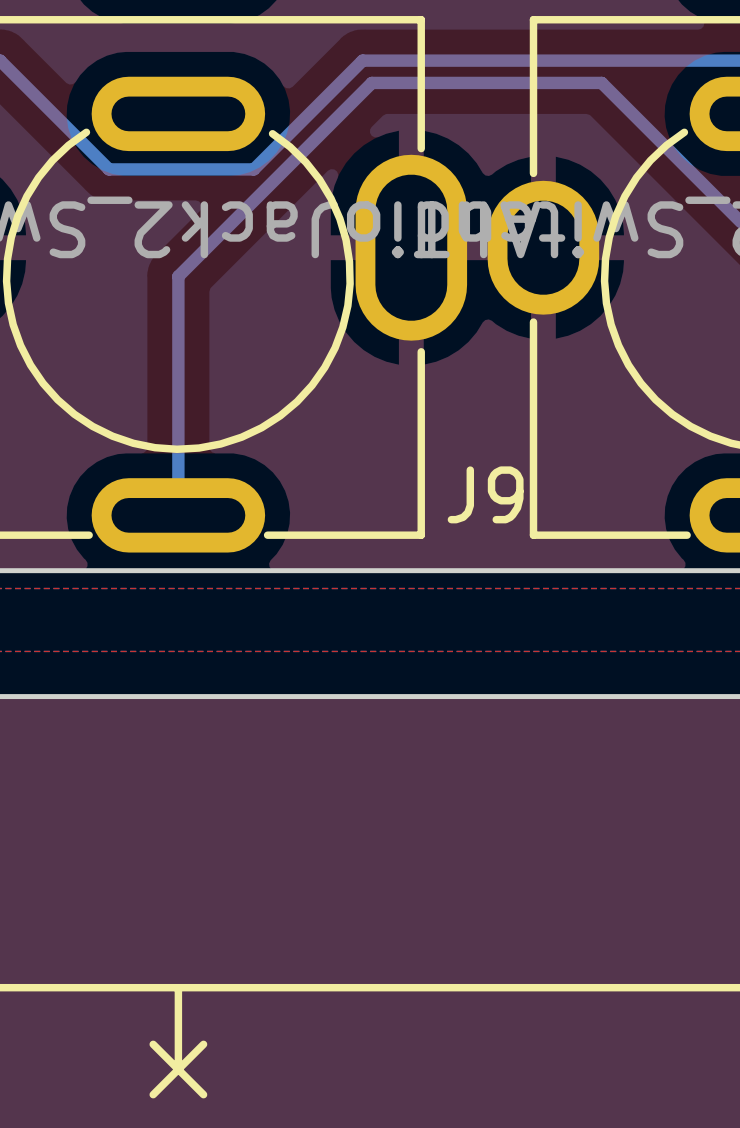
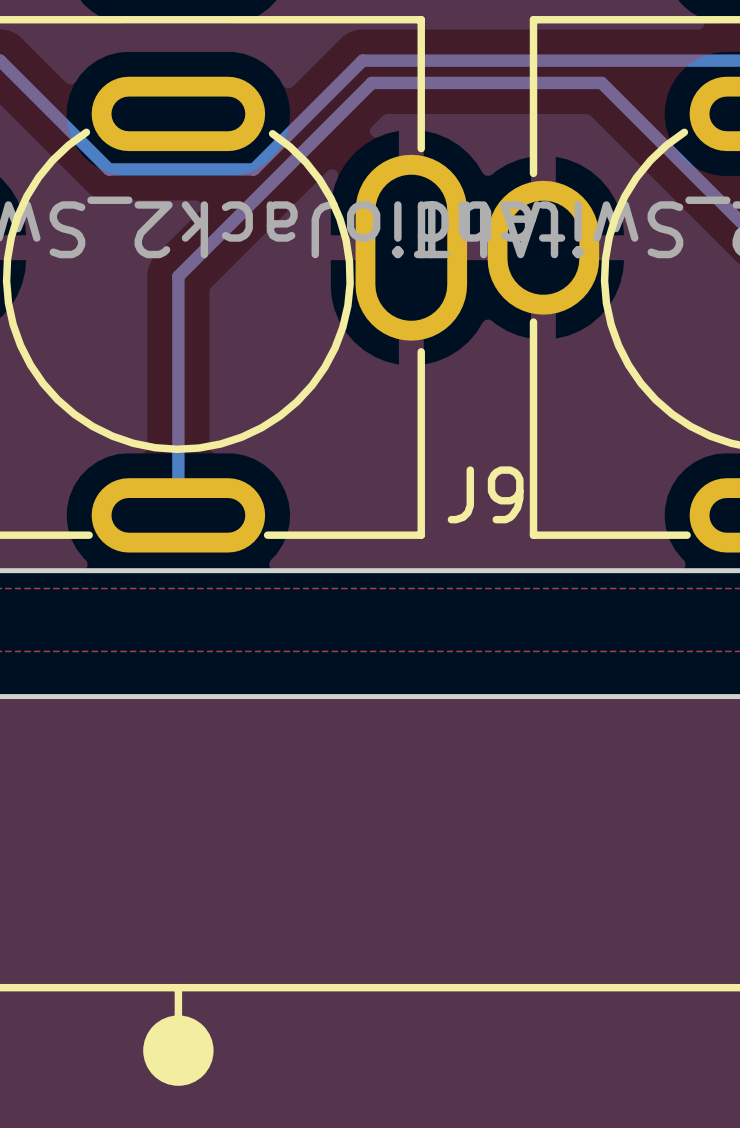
drawing: none -> [143, 1015, 214, 1086]
line: (178, 1019) (178, 1069) -> none
line: (153, 1044) (203, 1094) -> none
line: (203, 1044) (153, 1094) -> none

